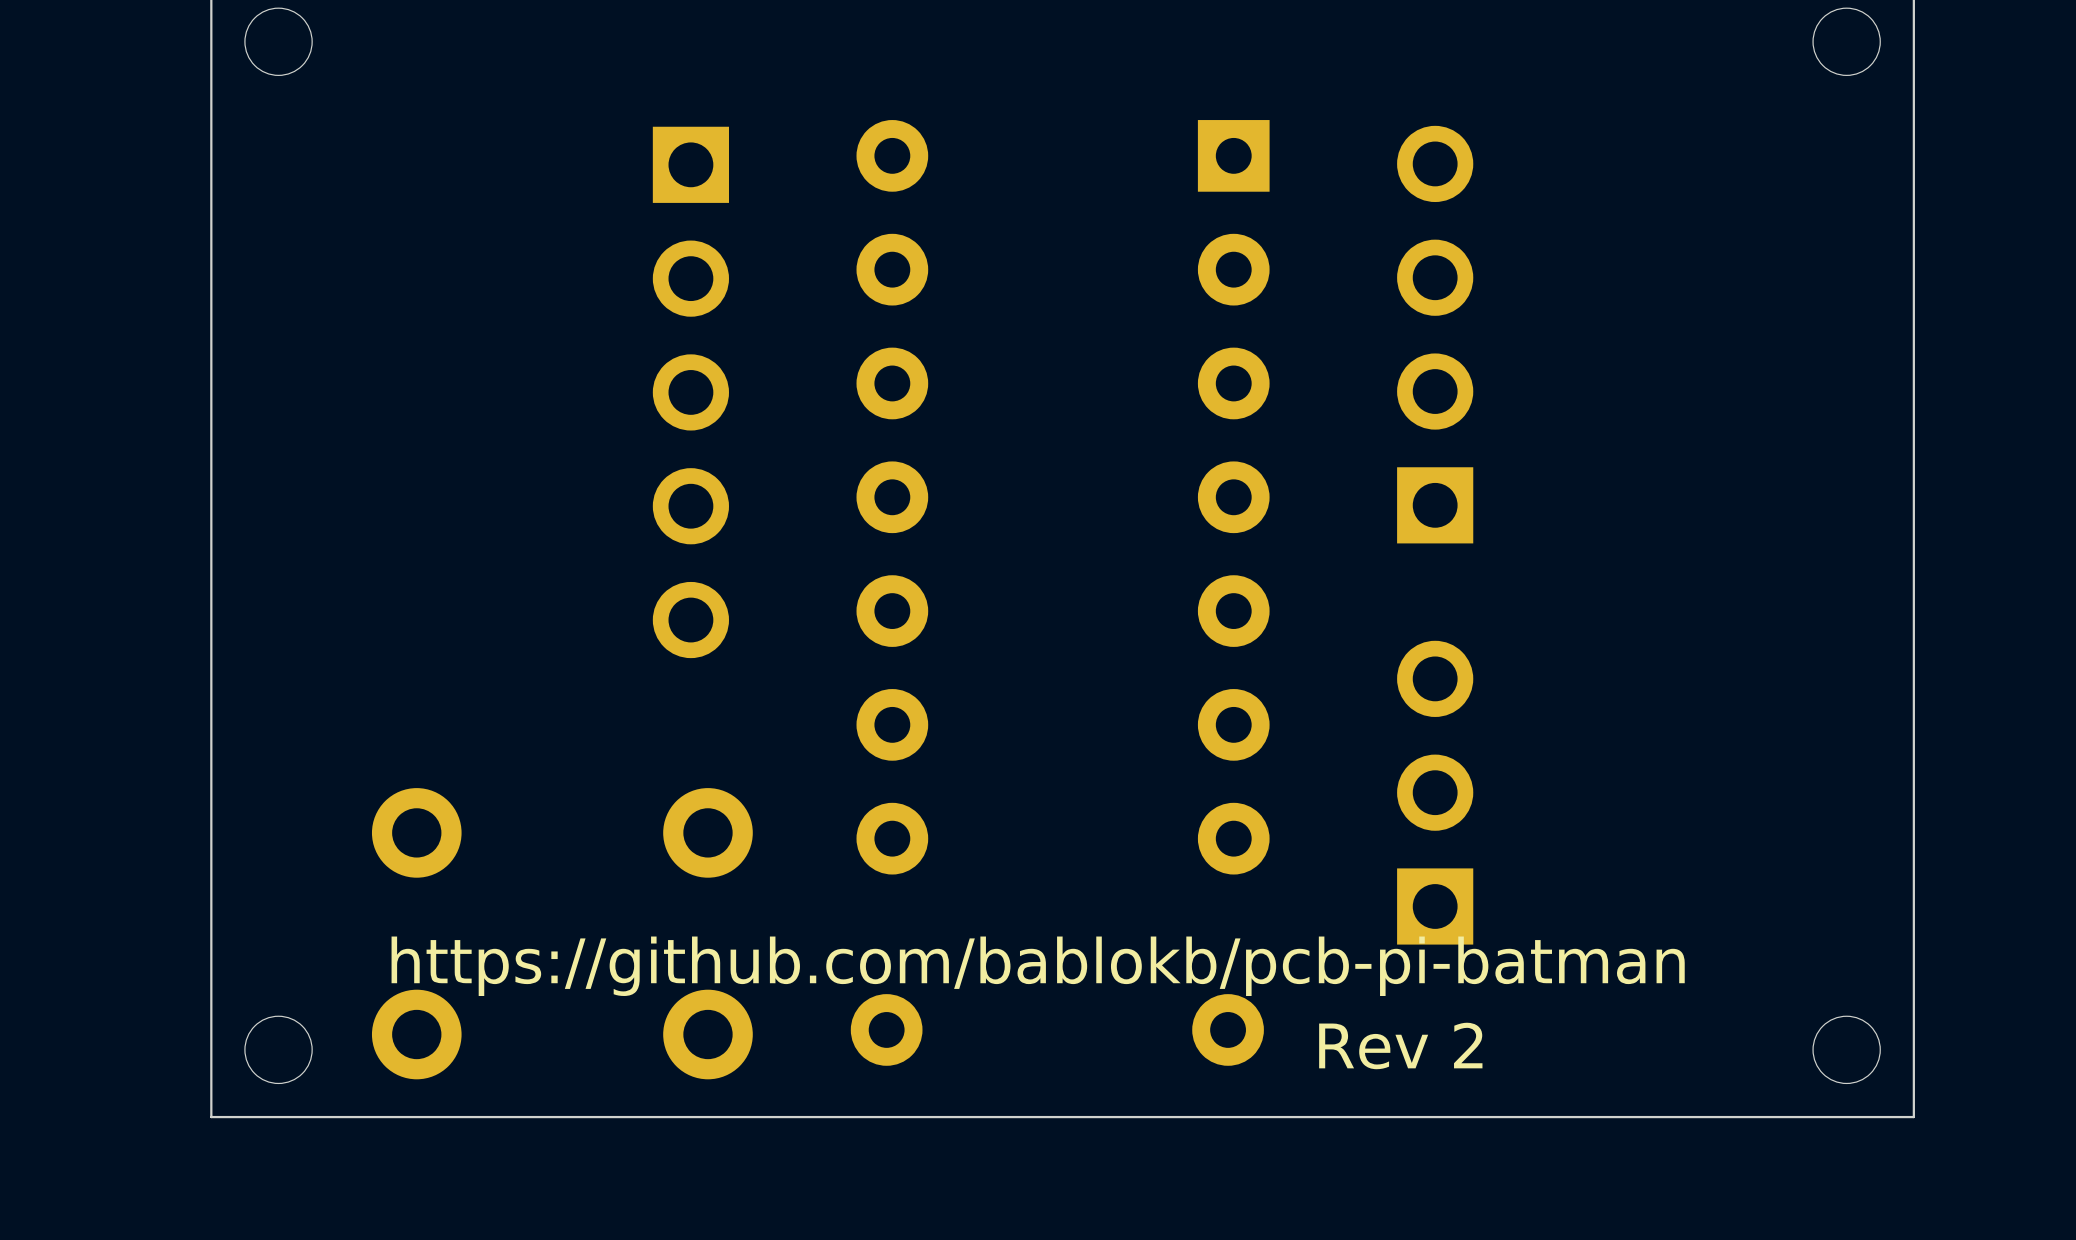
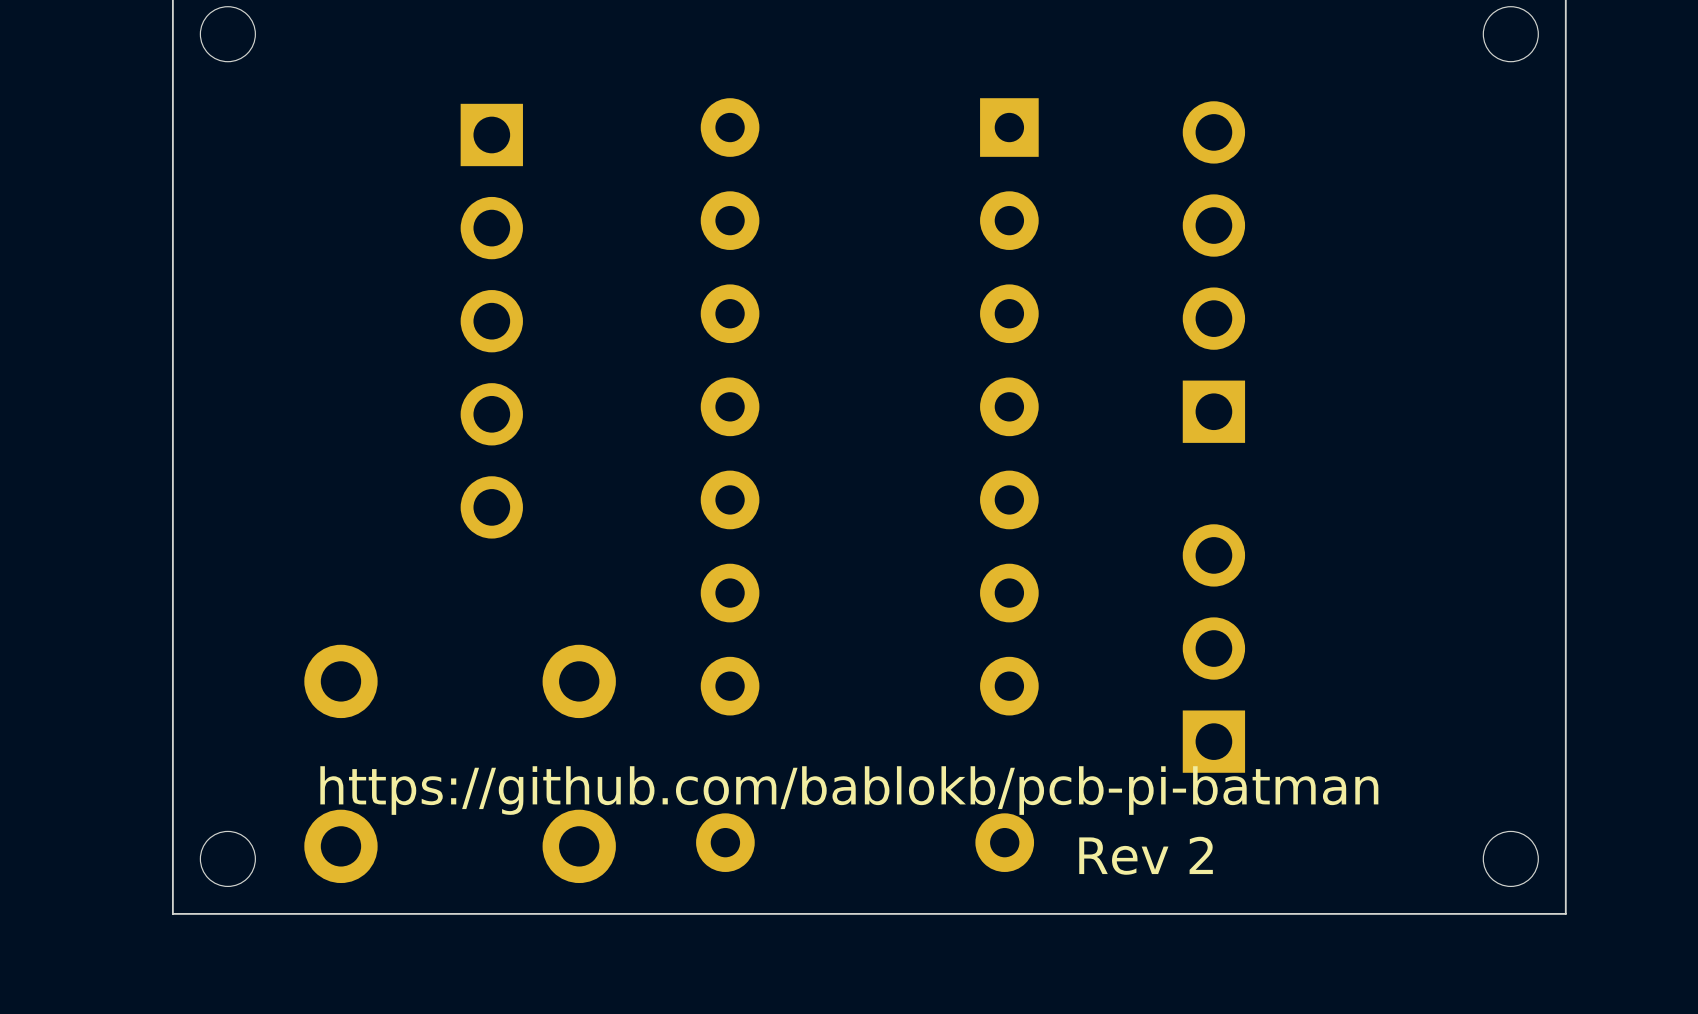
part position: (1435, 334) -> (1213, 272)
part position: (690, 392) -> (491, 321)
part position: (1435, 792) -> (1213, 648)

